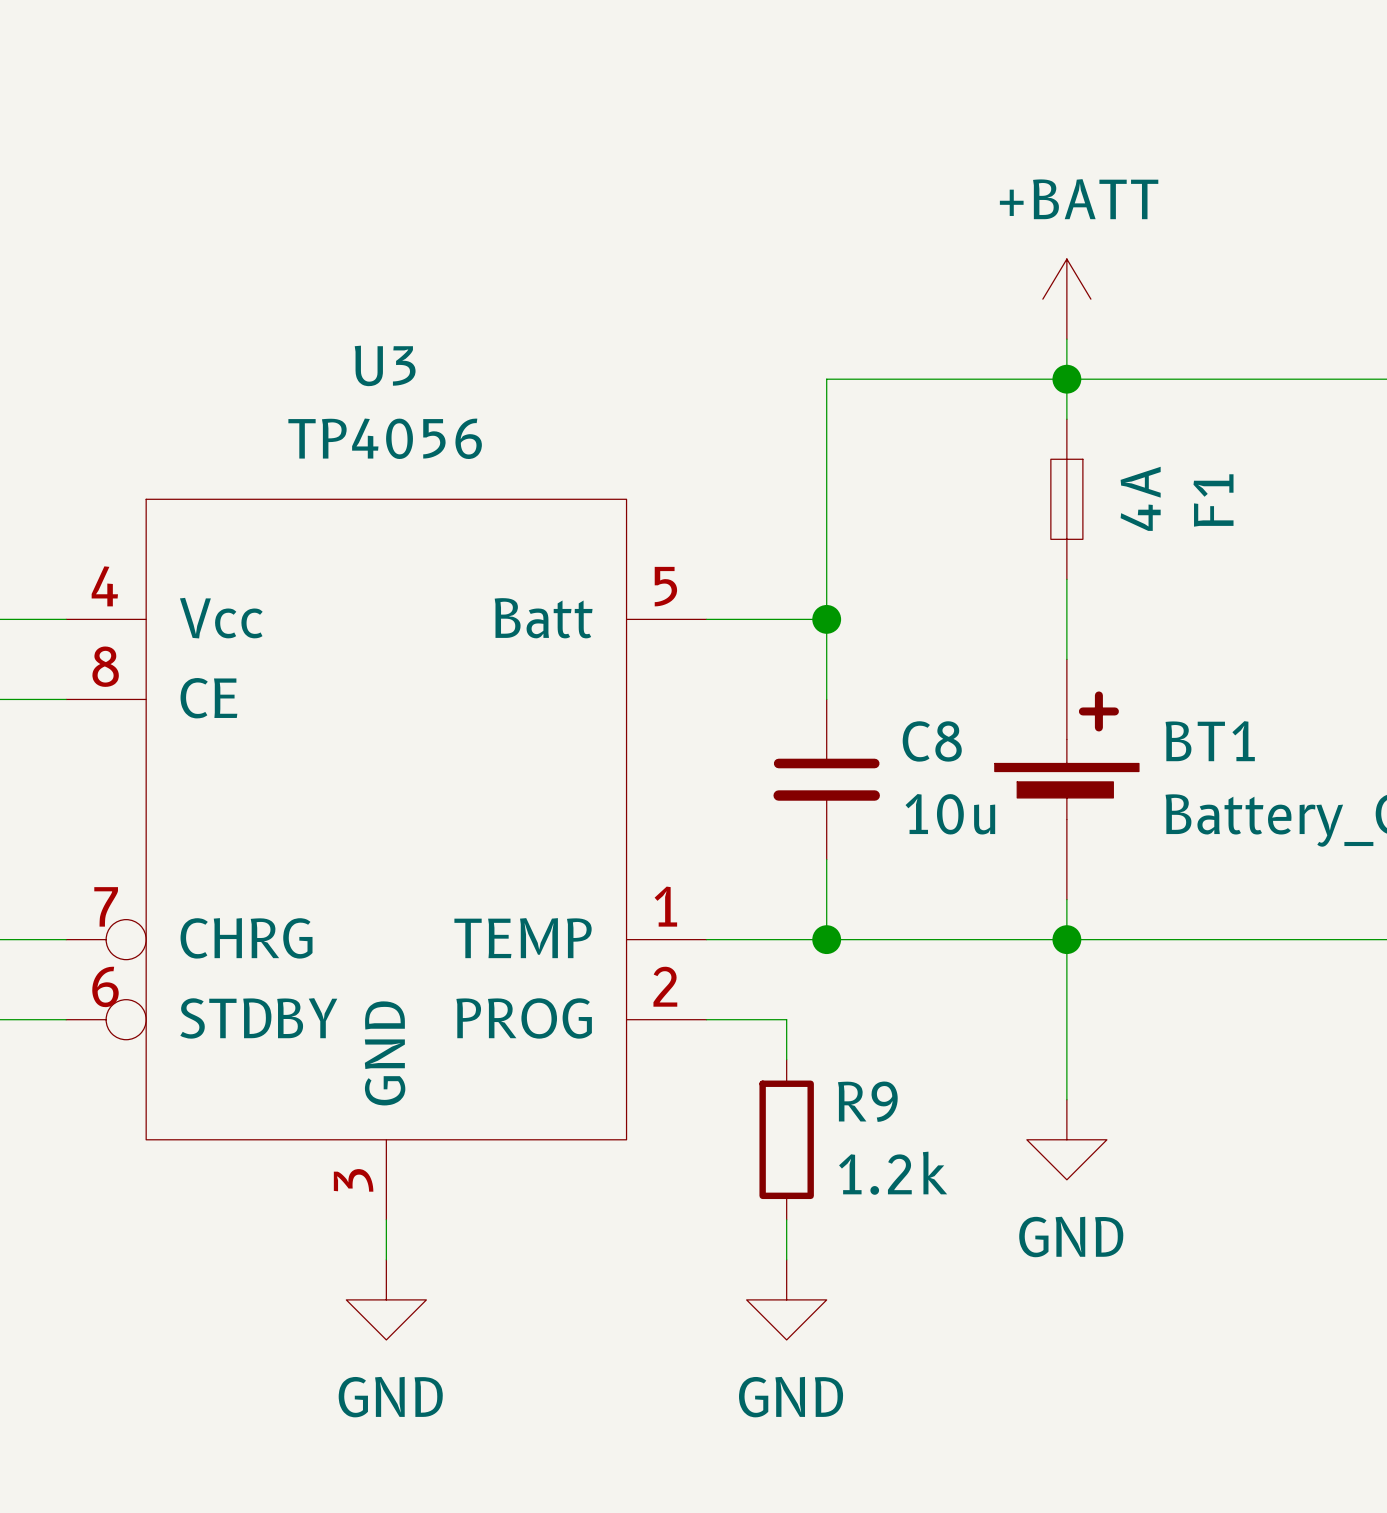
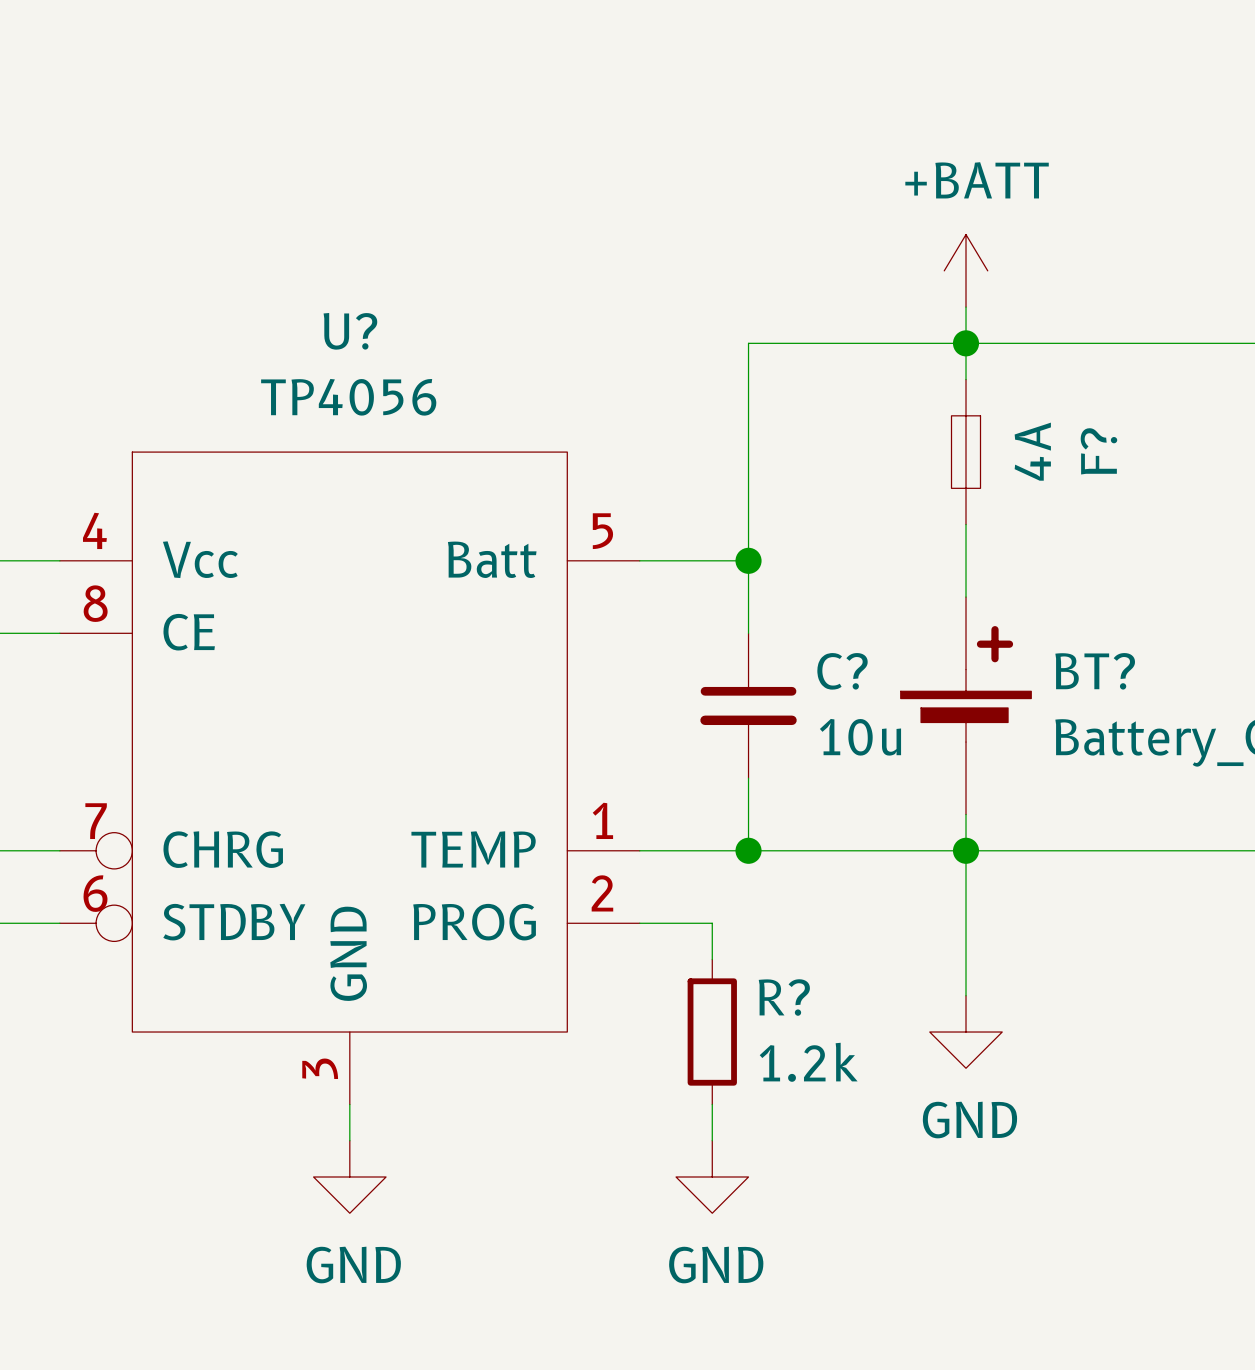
U3 name: U3 (385, 365) -> U? (350, 331)
F1 name: F1 (1213, 500) -> F? (1098, 451)
C8 name: C8 (932, 741) -> C? (842, 671)
BT1 name: BT1 (1210, 741) -> BT? (1095, 671)
R9 name: R9 (867, 1101) -> R? (784, 997)

